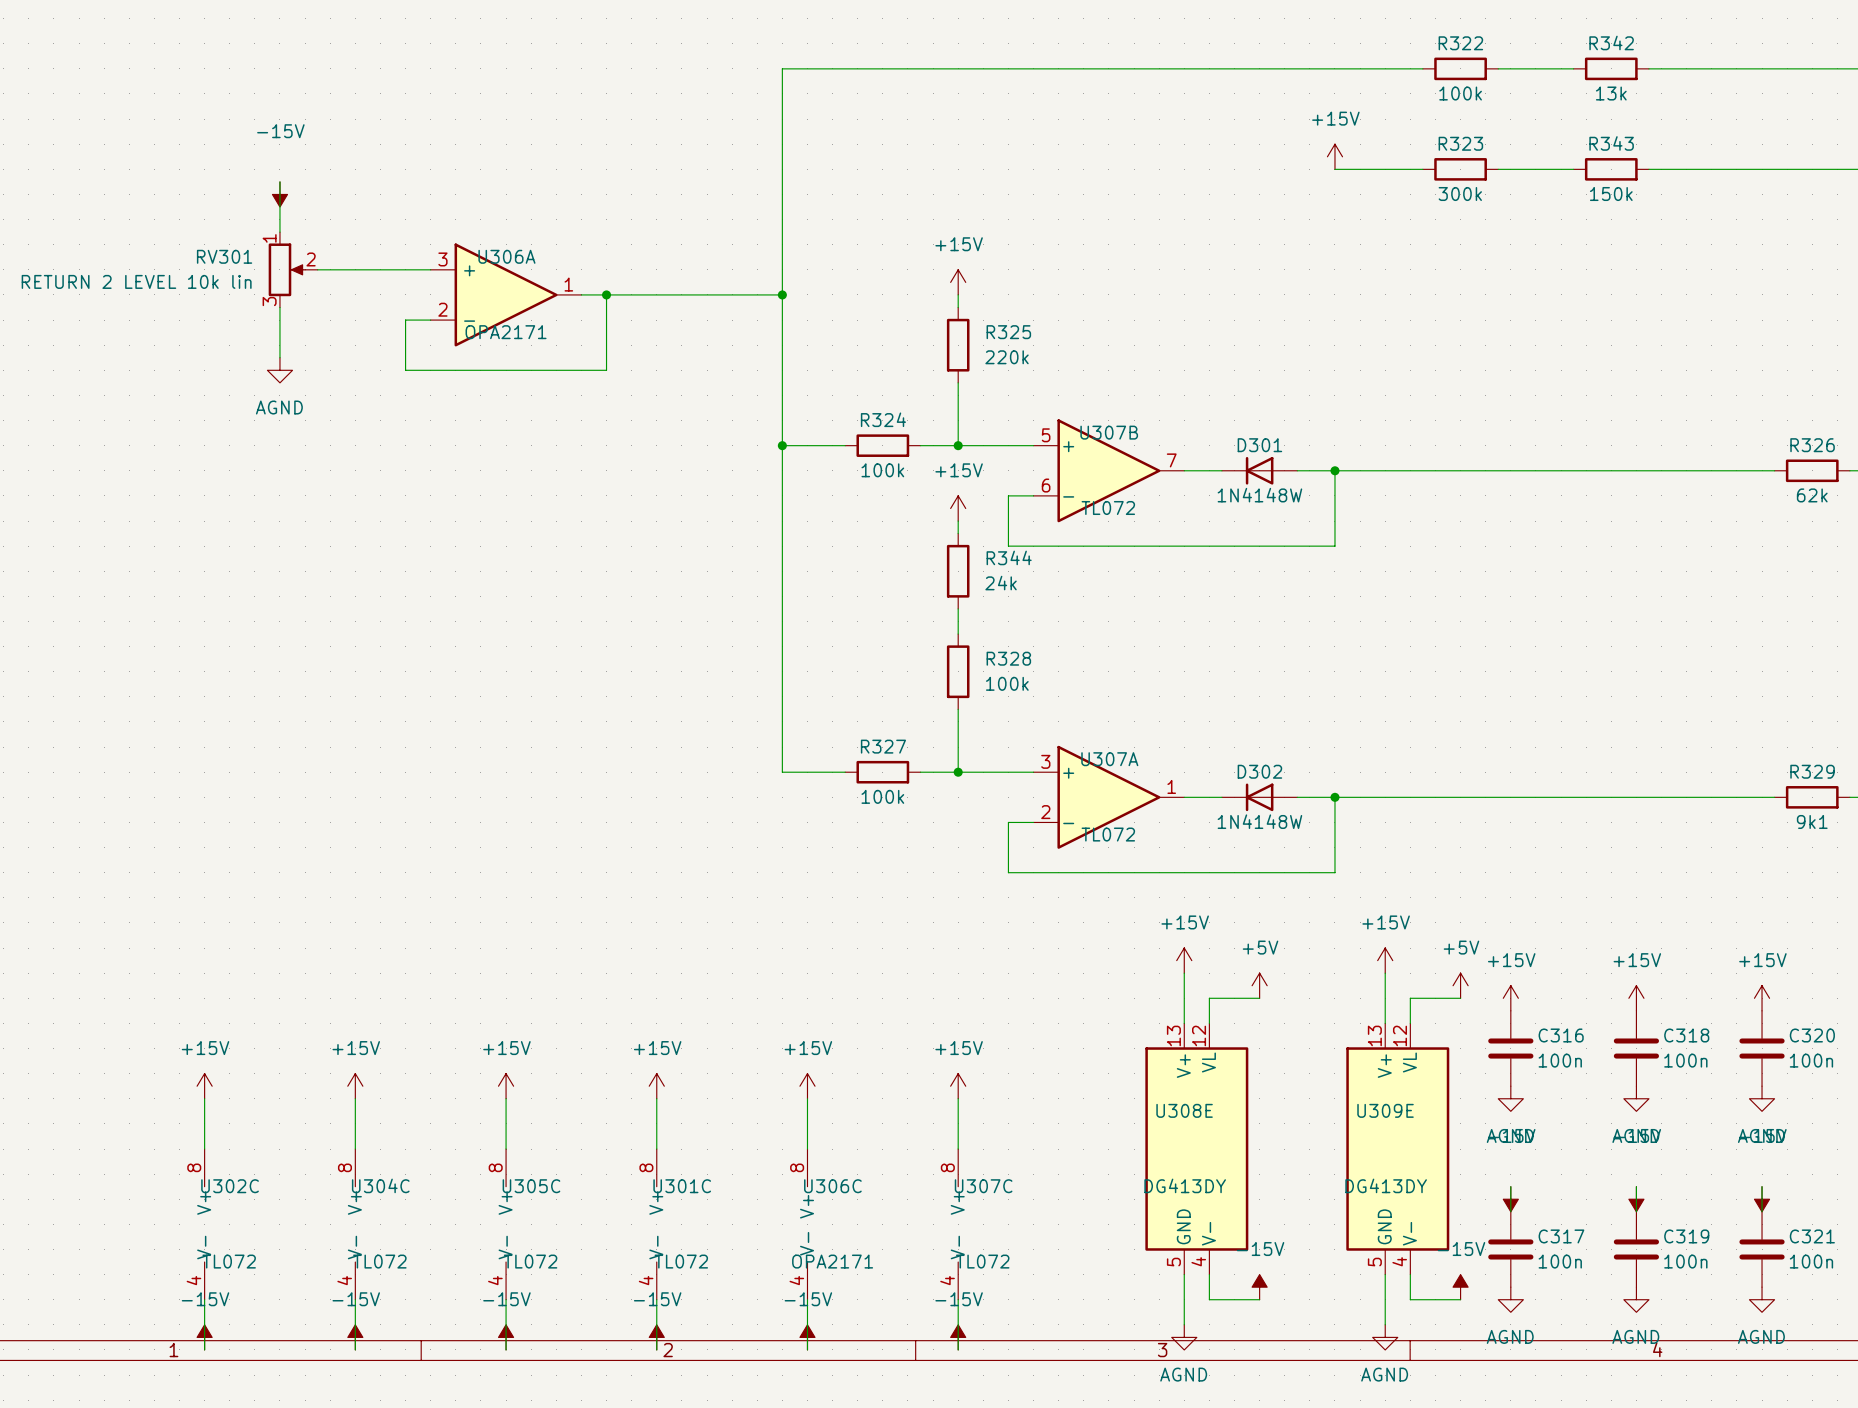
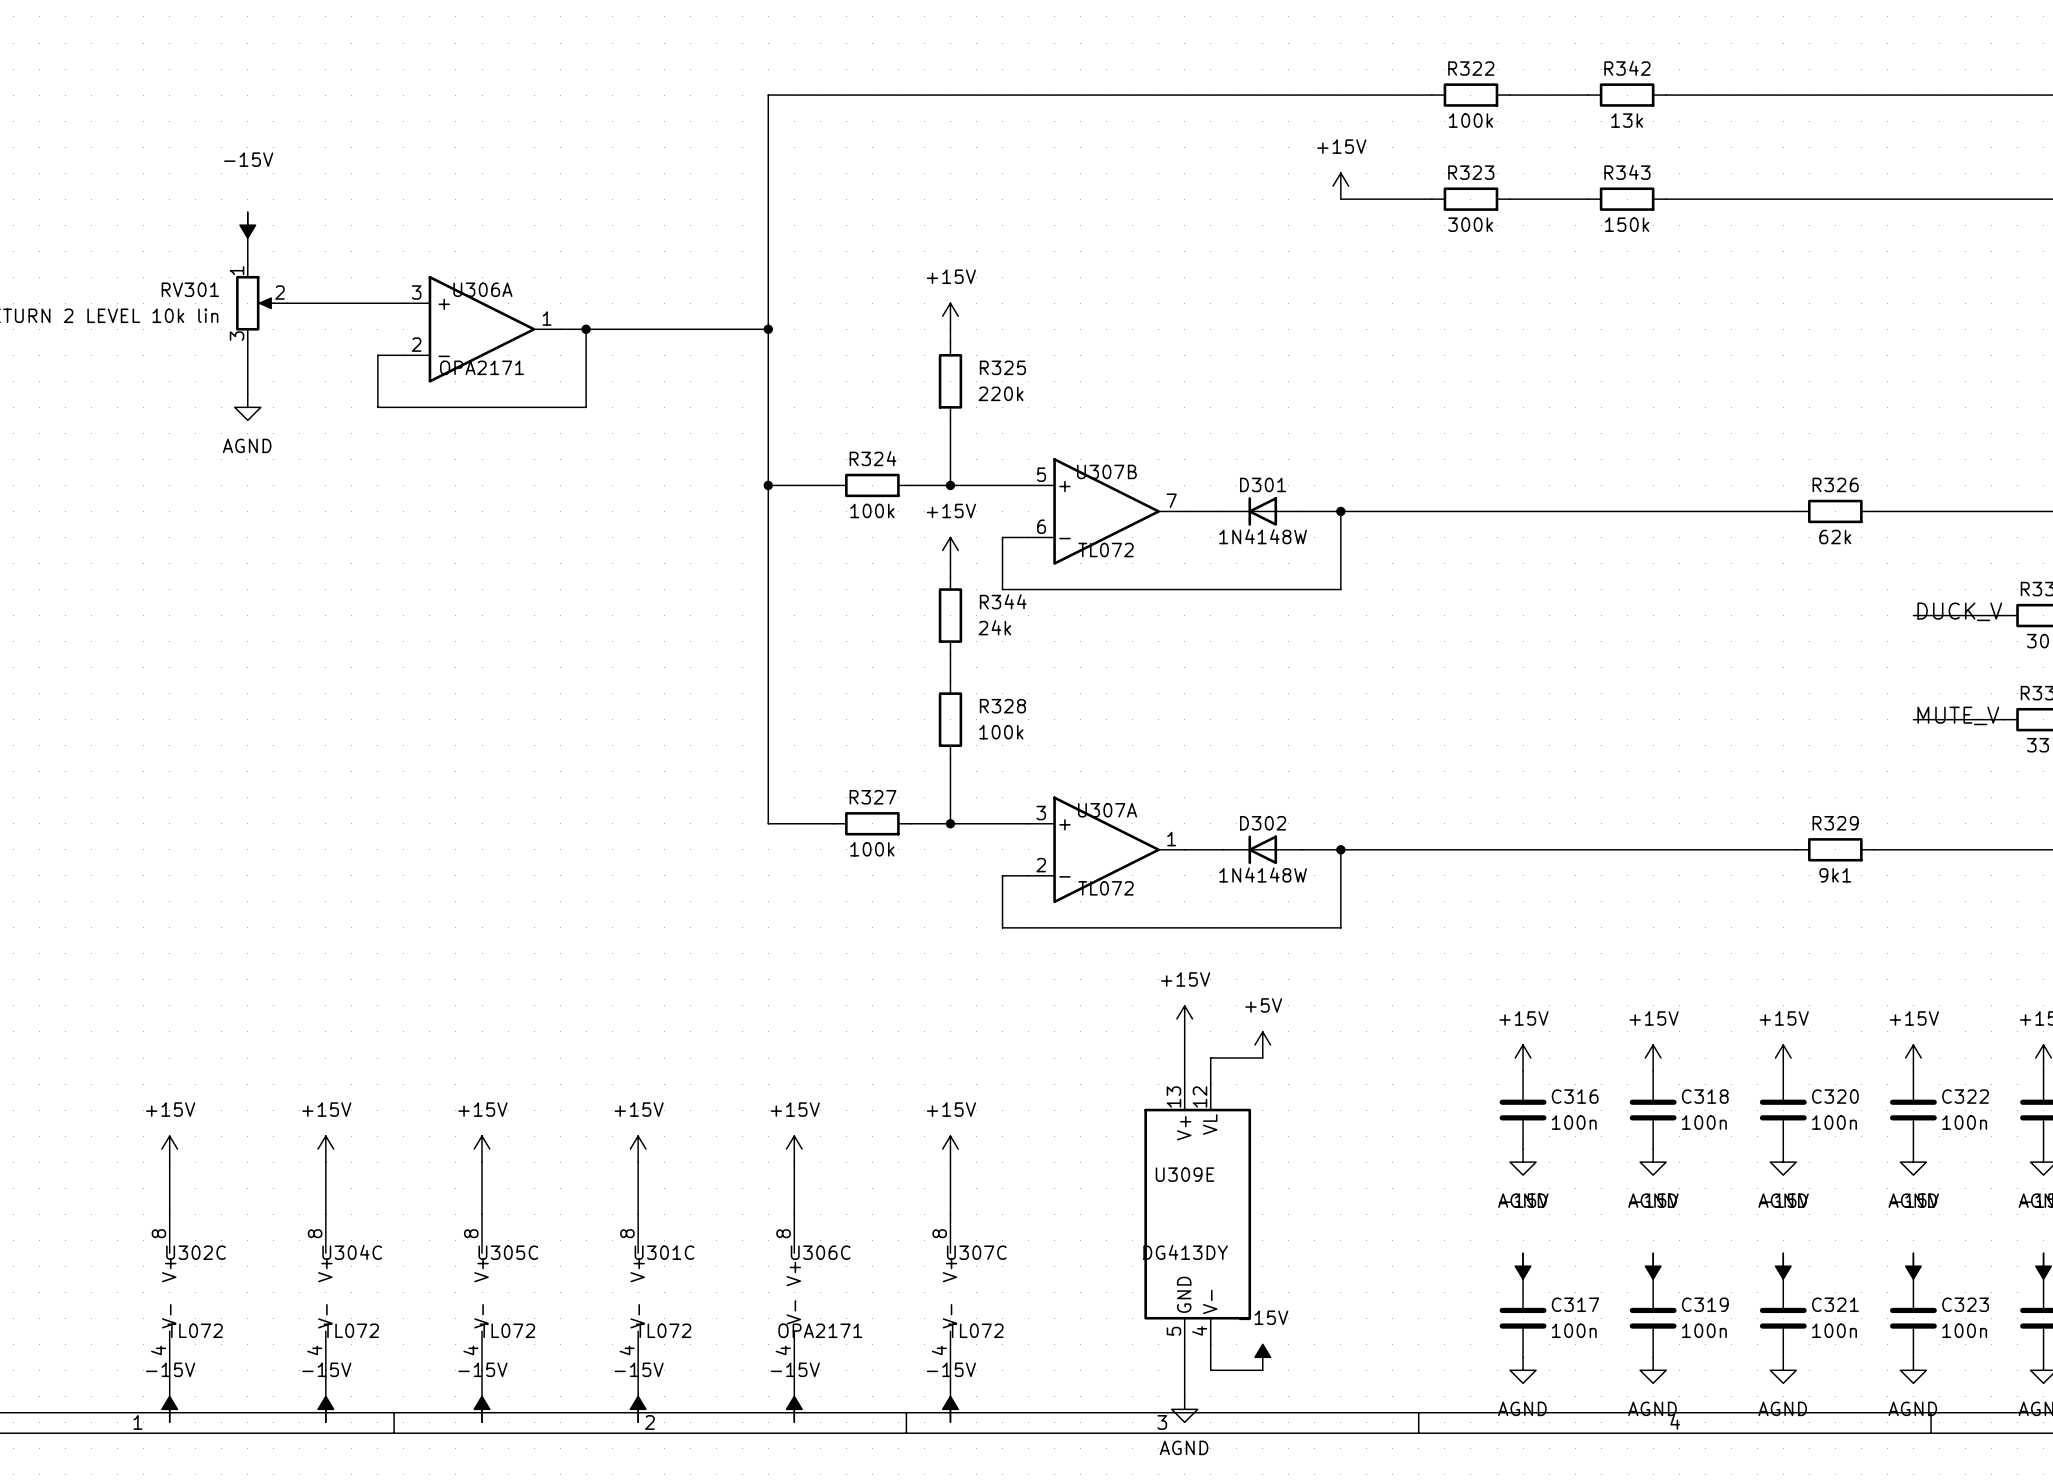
power symbol: +15V (1385, 960) -> none
wire: (1385, 973) (1385, 1023) -> none
power symbol: +5V (1460, 985) -> none
wire: (1460, 998) (1410, 998) (1410, 1023) -> none
U308E name: U308E (1184, 1110) -> U309E (1185, 1174)
U309E: DG413DY (1397, 1149) -> none
wire: (1385, 1274) (1385, 1324) -> none
wire: (1410, 1274) (1410, 1299) (1460, 1299) -> none
power symbol: -15V (1460, 1287) -> none
power symbol: AGND (1385, 1337) -> none

